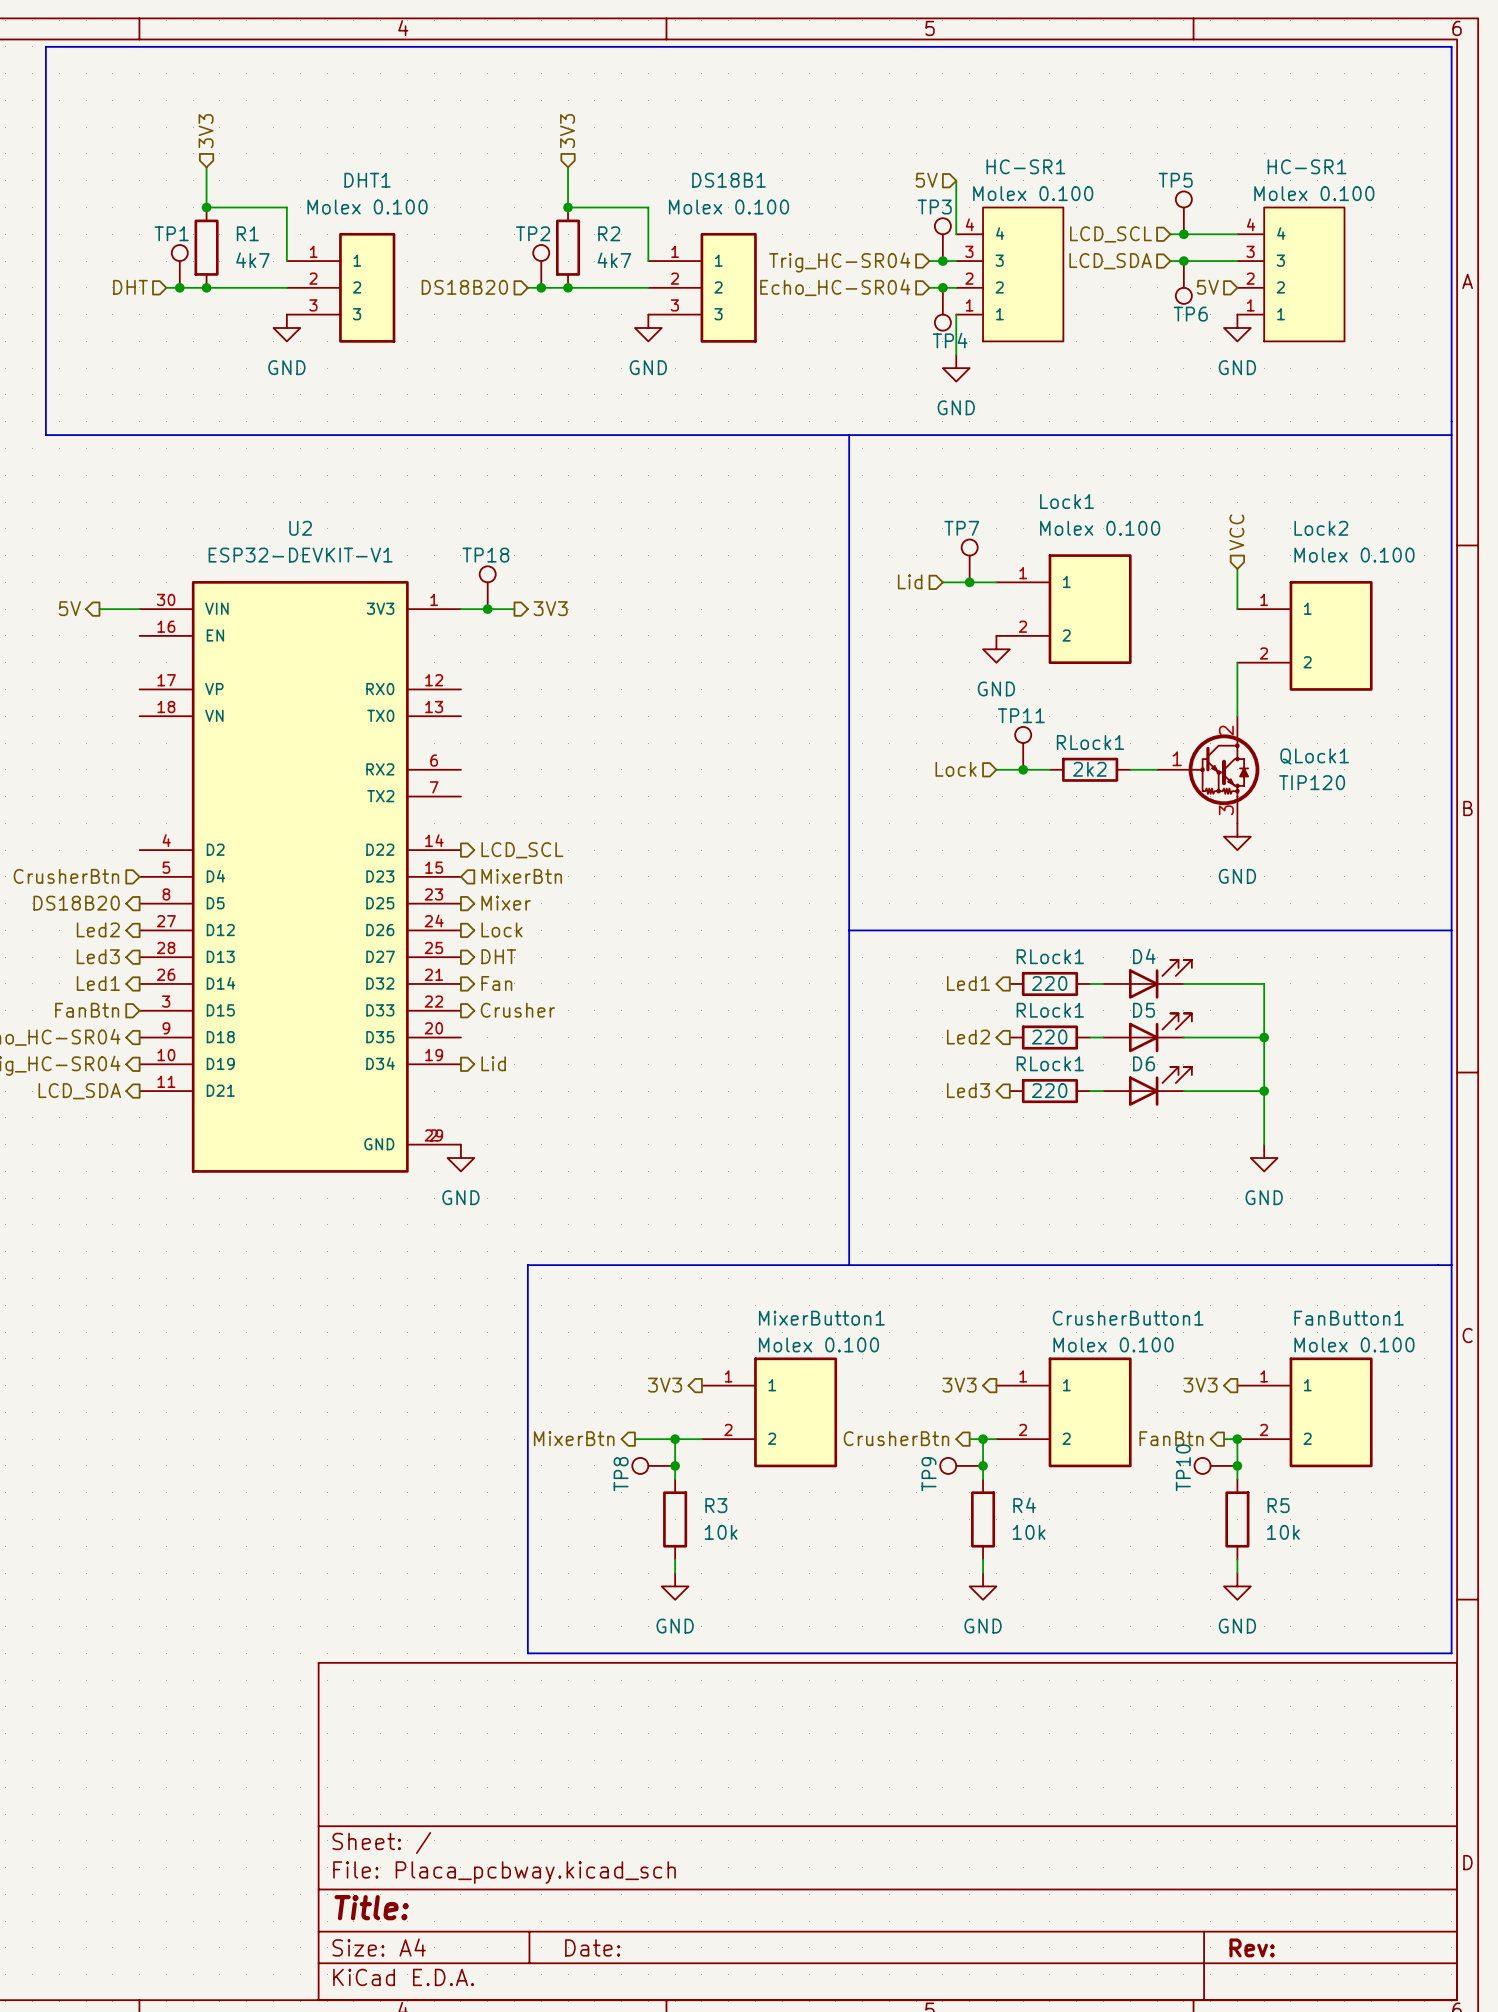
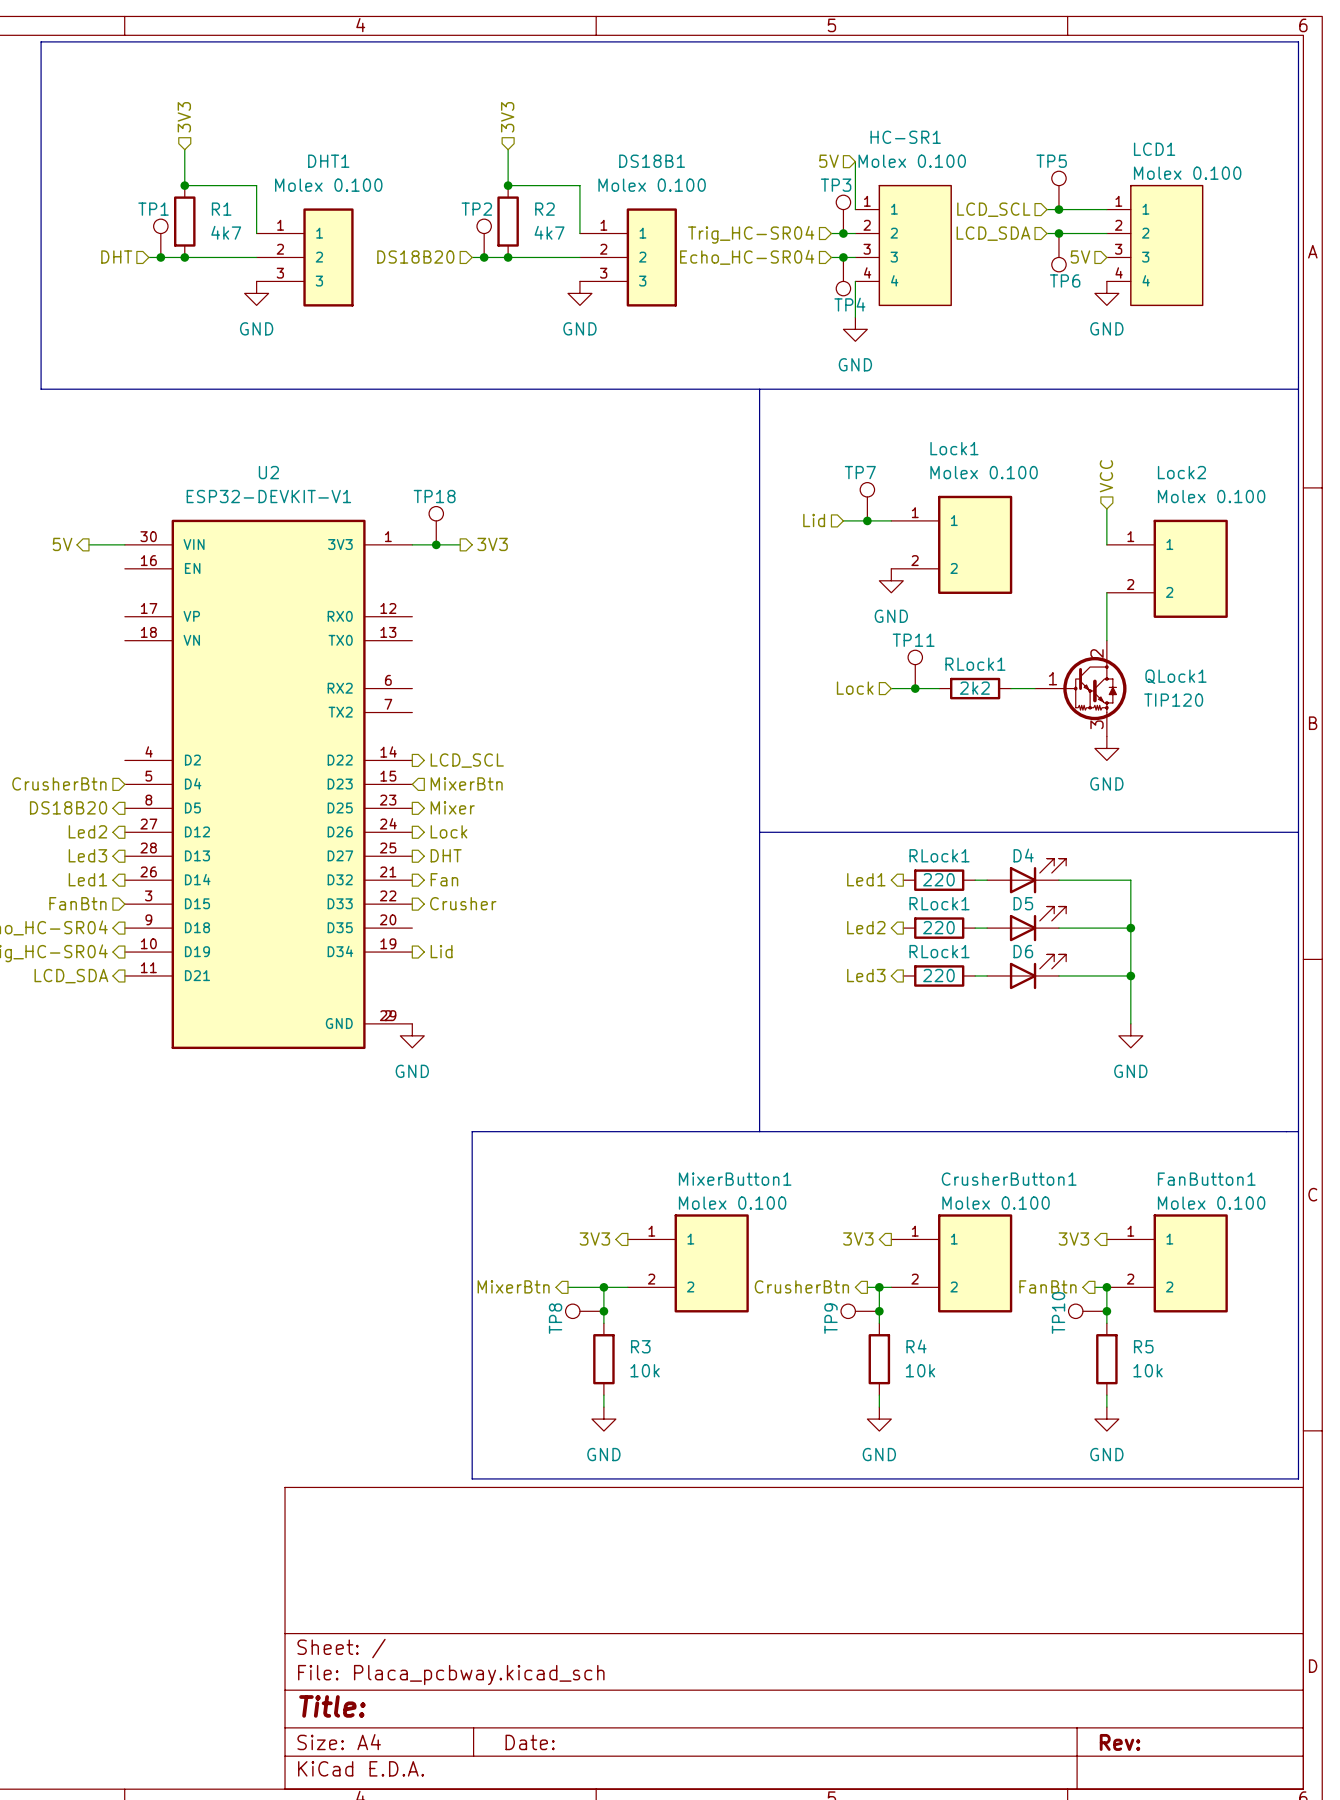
HC-SR1 name: HC-SR1 (1306, 166) -> LCD1 (1154, 149)
HC-SR1 flip: as is (1023, 274) -> up-down (915, 245)
HC-SR1 flip: as is (1304, 274) -> up-down (1166, 245)

